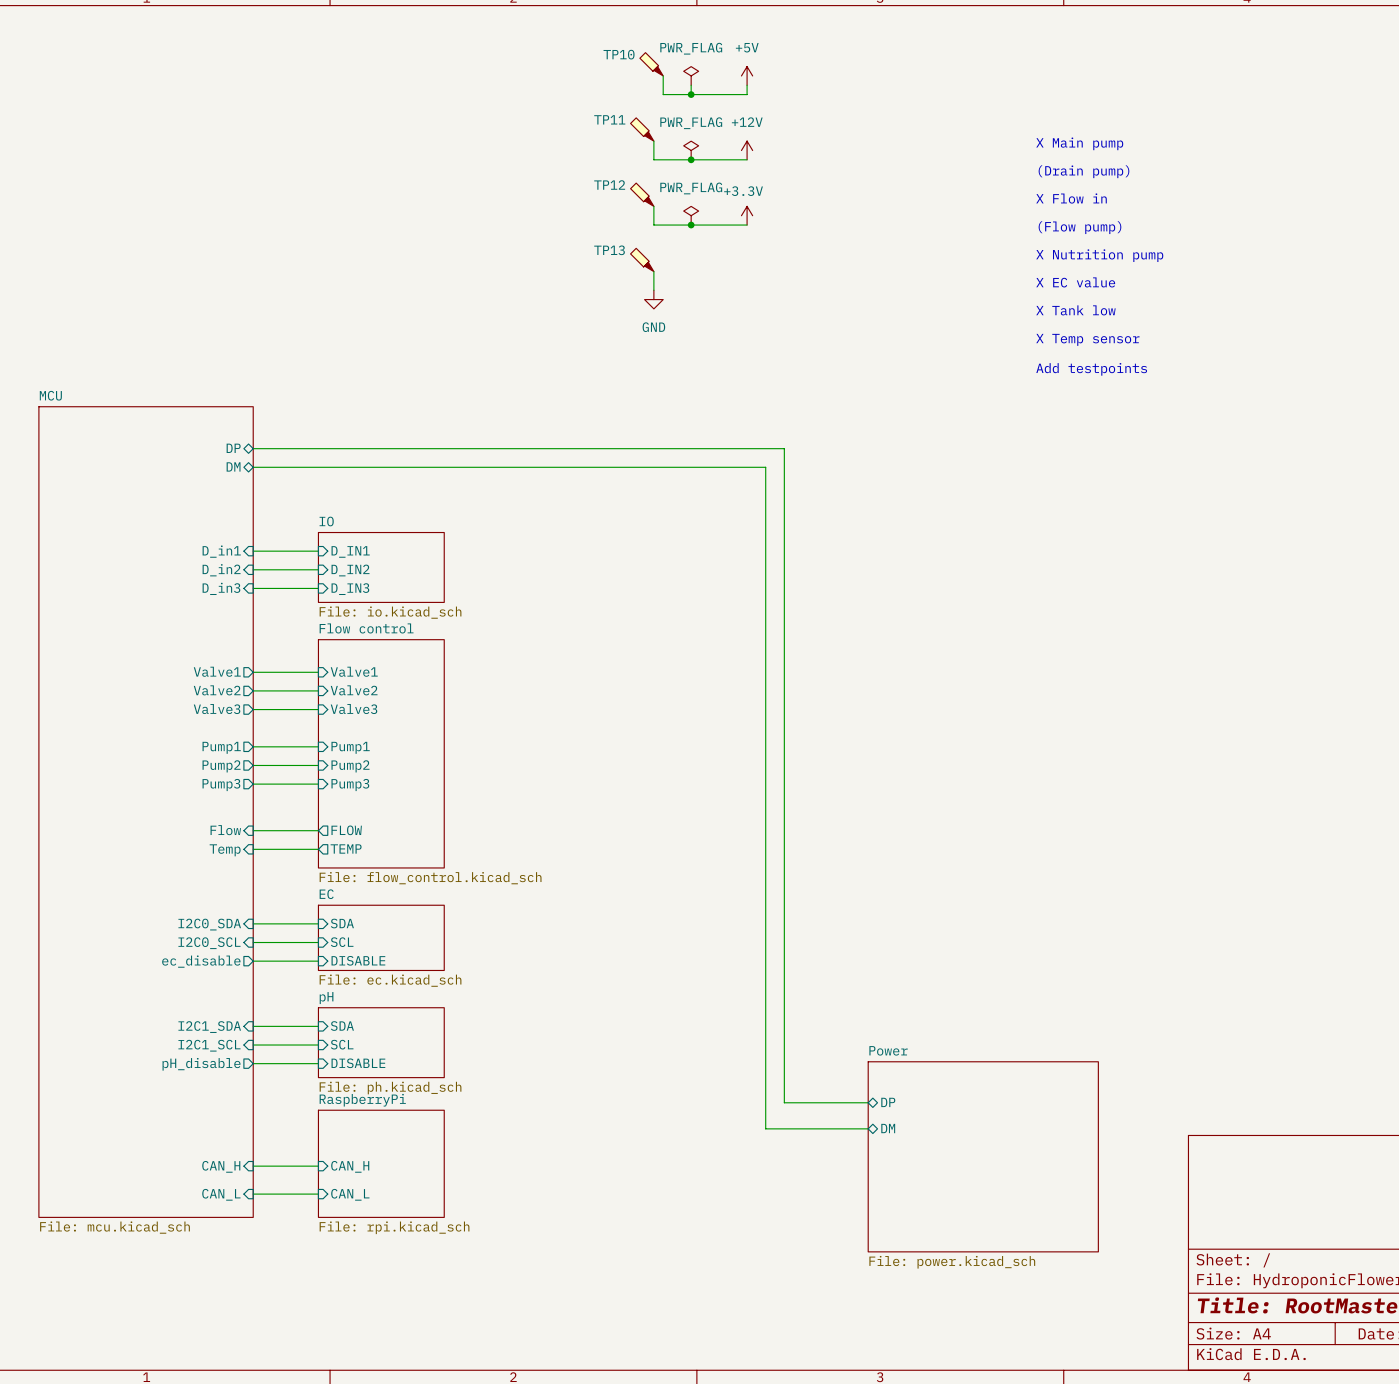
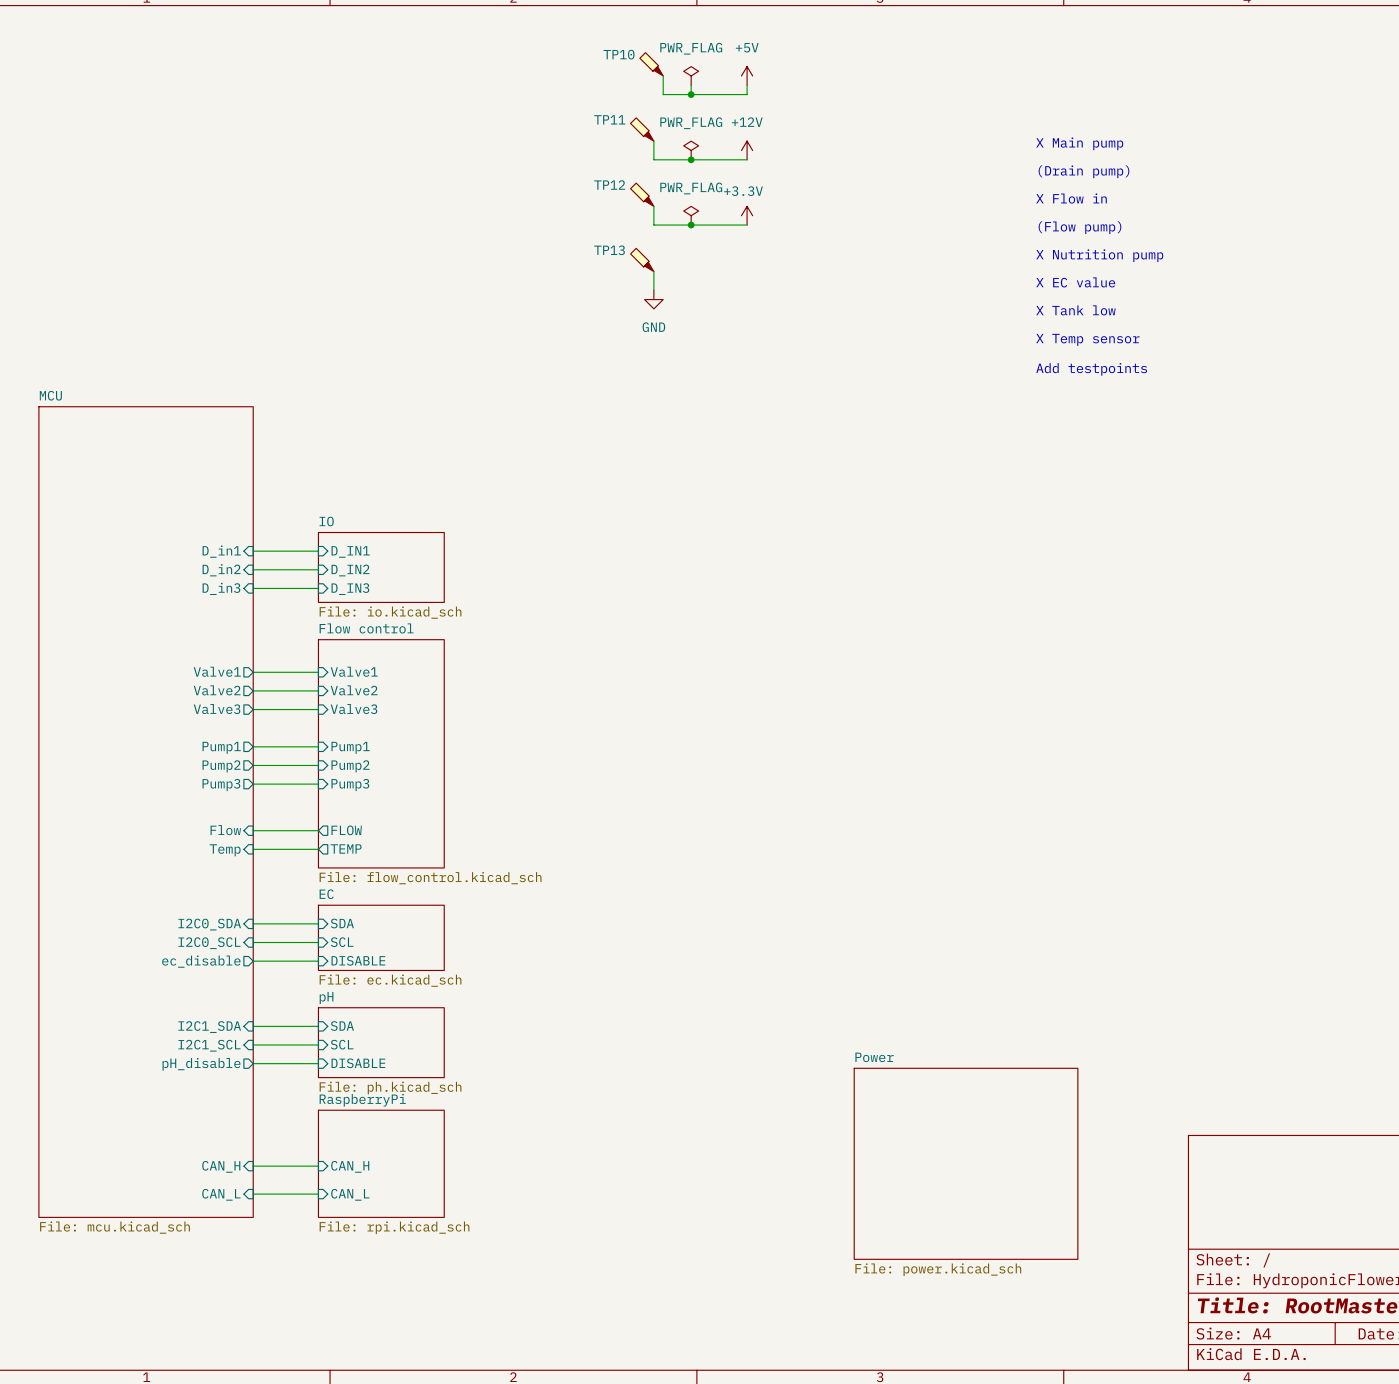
sheet pin: DP (233, 448) -> none
wire: (253, 448) (784, 448) (784, 1102) (868, 1102) -> none
sheet pin: DM (233, 466) -> none
wire: (253, 467) (765, 467) (765, 1128) (868, 1128) -> none
sheet pin: DP (888, 1102) -> none
sheet pin: DM (888, 1128) -> none
sheet Power: File: power.kicad_sch (983, 1156) -> none
sheet Power: none -> File: power.kicad_sch (966, 1163)

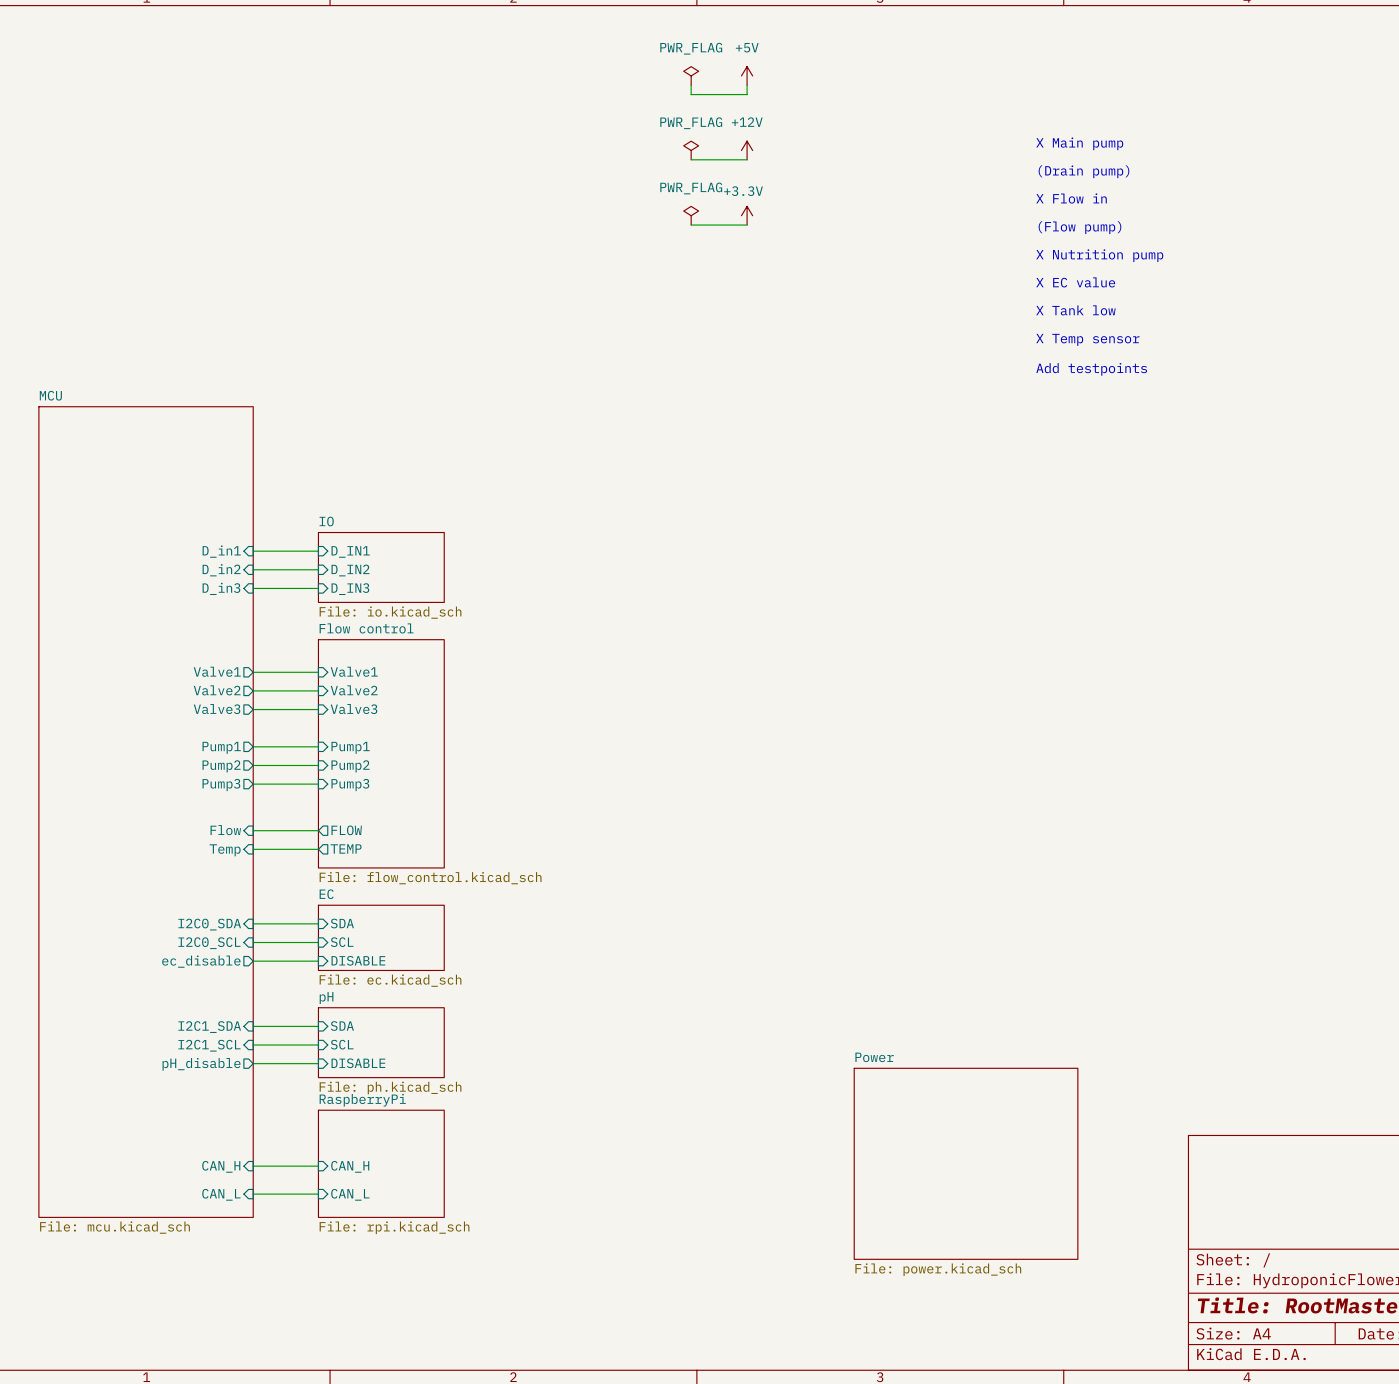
TP10: (651, 64) -> none
wire: (663, 75) (663, 94) (691, 94) -> none
junction: (691, 94) -> none
TP11: (642, 129) -> none
wire: (653, 141) (653, 159) (691, 159) -> none
junction: (691, 159) -> none
TP12: (642, 194) -> none
wire: (653, 206) (653, 225) (691, 225) -> none
junction: (691, 225) -> none
TP13: (642, 259) -> none
wire: (653, 271) (653, 290) -> none
power symbol: GND (653, 299) -> none

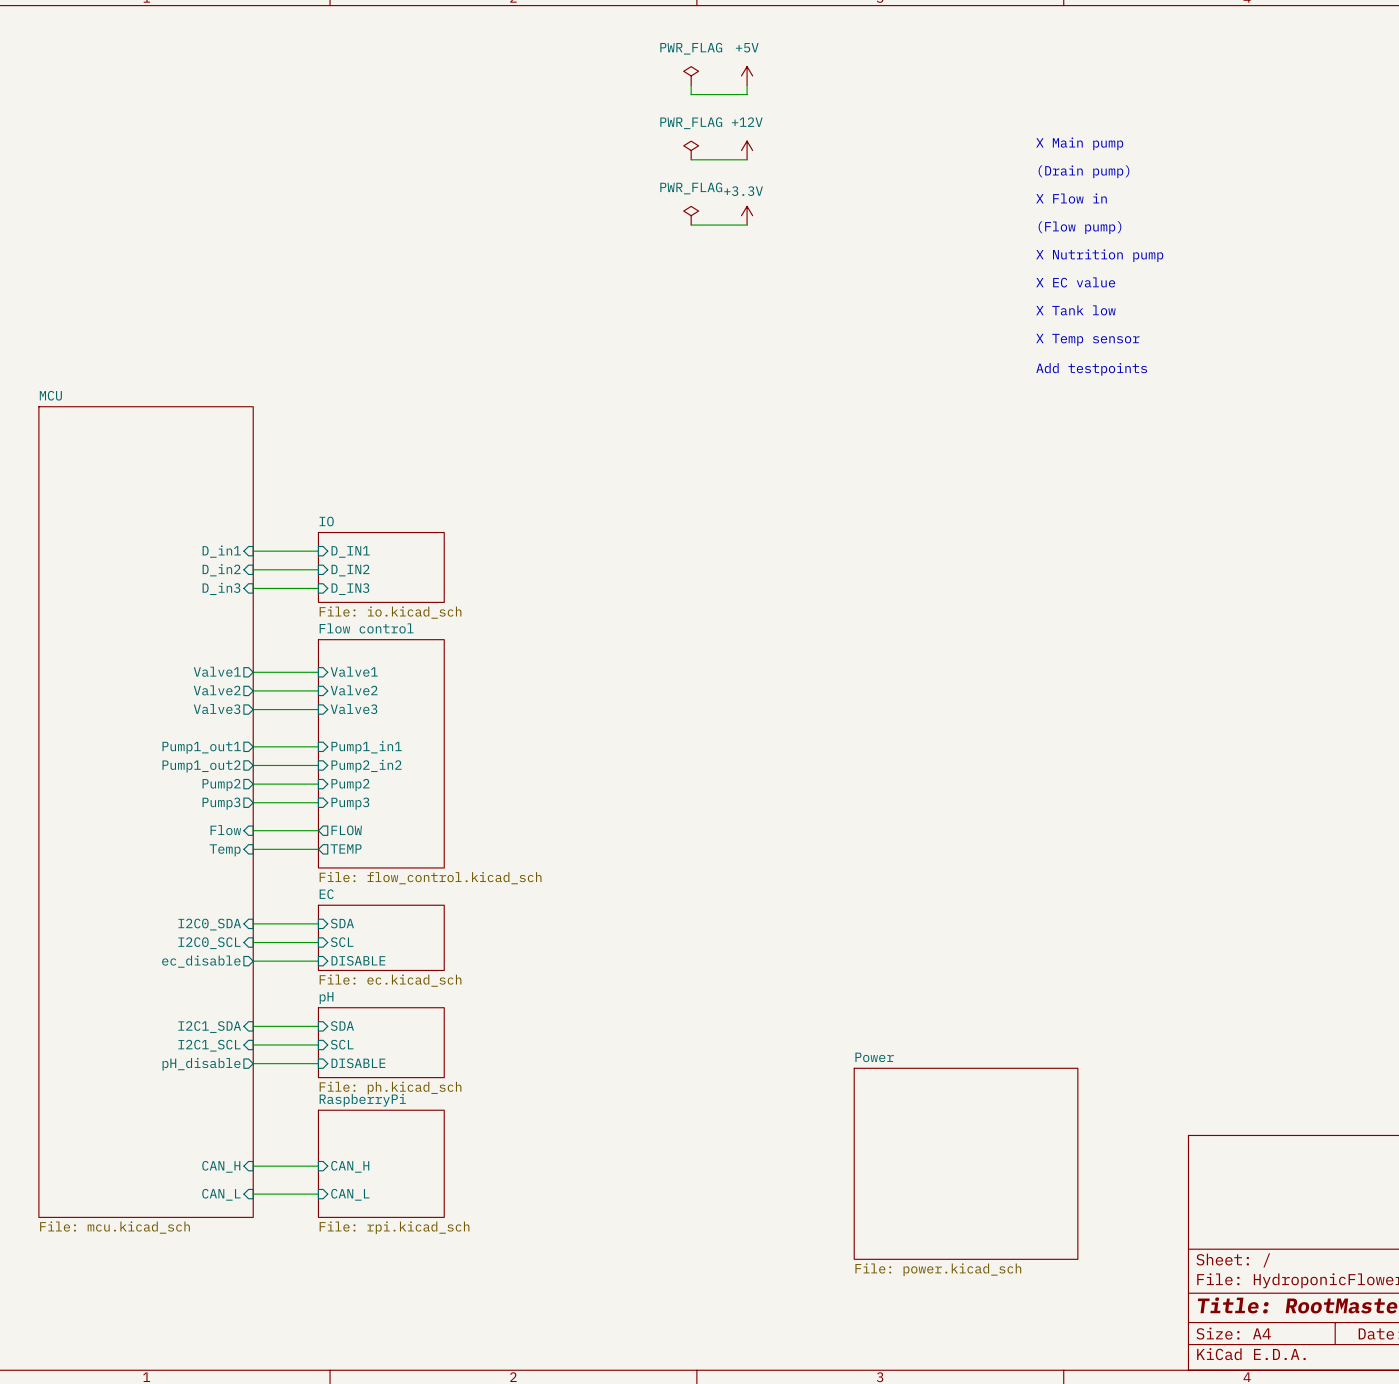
sheet pin: Pump1 (221, 747) -> Pump1_out1 (201, 747)
sheet pin: Pump1 (350, 747) -> Pump1_in1 (366, 747)
sheet pin: Pump2 (221, 766) -> Pump1_out2 (201, 766)
sheet pin: Pump2 (350, 766) -> Pump2_in2 (366, 766)
sheet pin: Pump3 (221, 785) -> Pump2 (221, 785)
sheet pin: Pump3 (350, 785) -> Pump2 (350, 785)
wire: none -> (253, 802) (318, 802)
sheet pin: none -> Pump3 (221, 803)
sheet pin: none -> Pump3 (350, 803)

